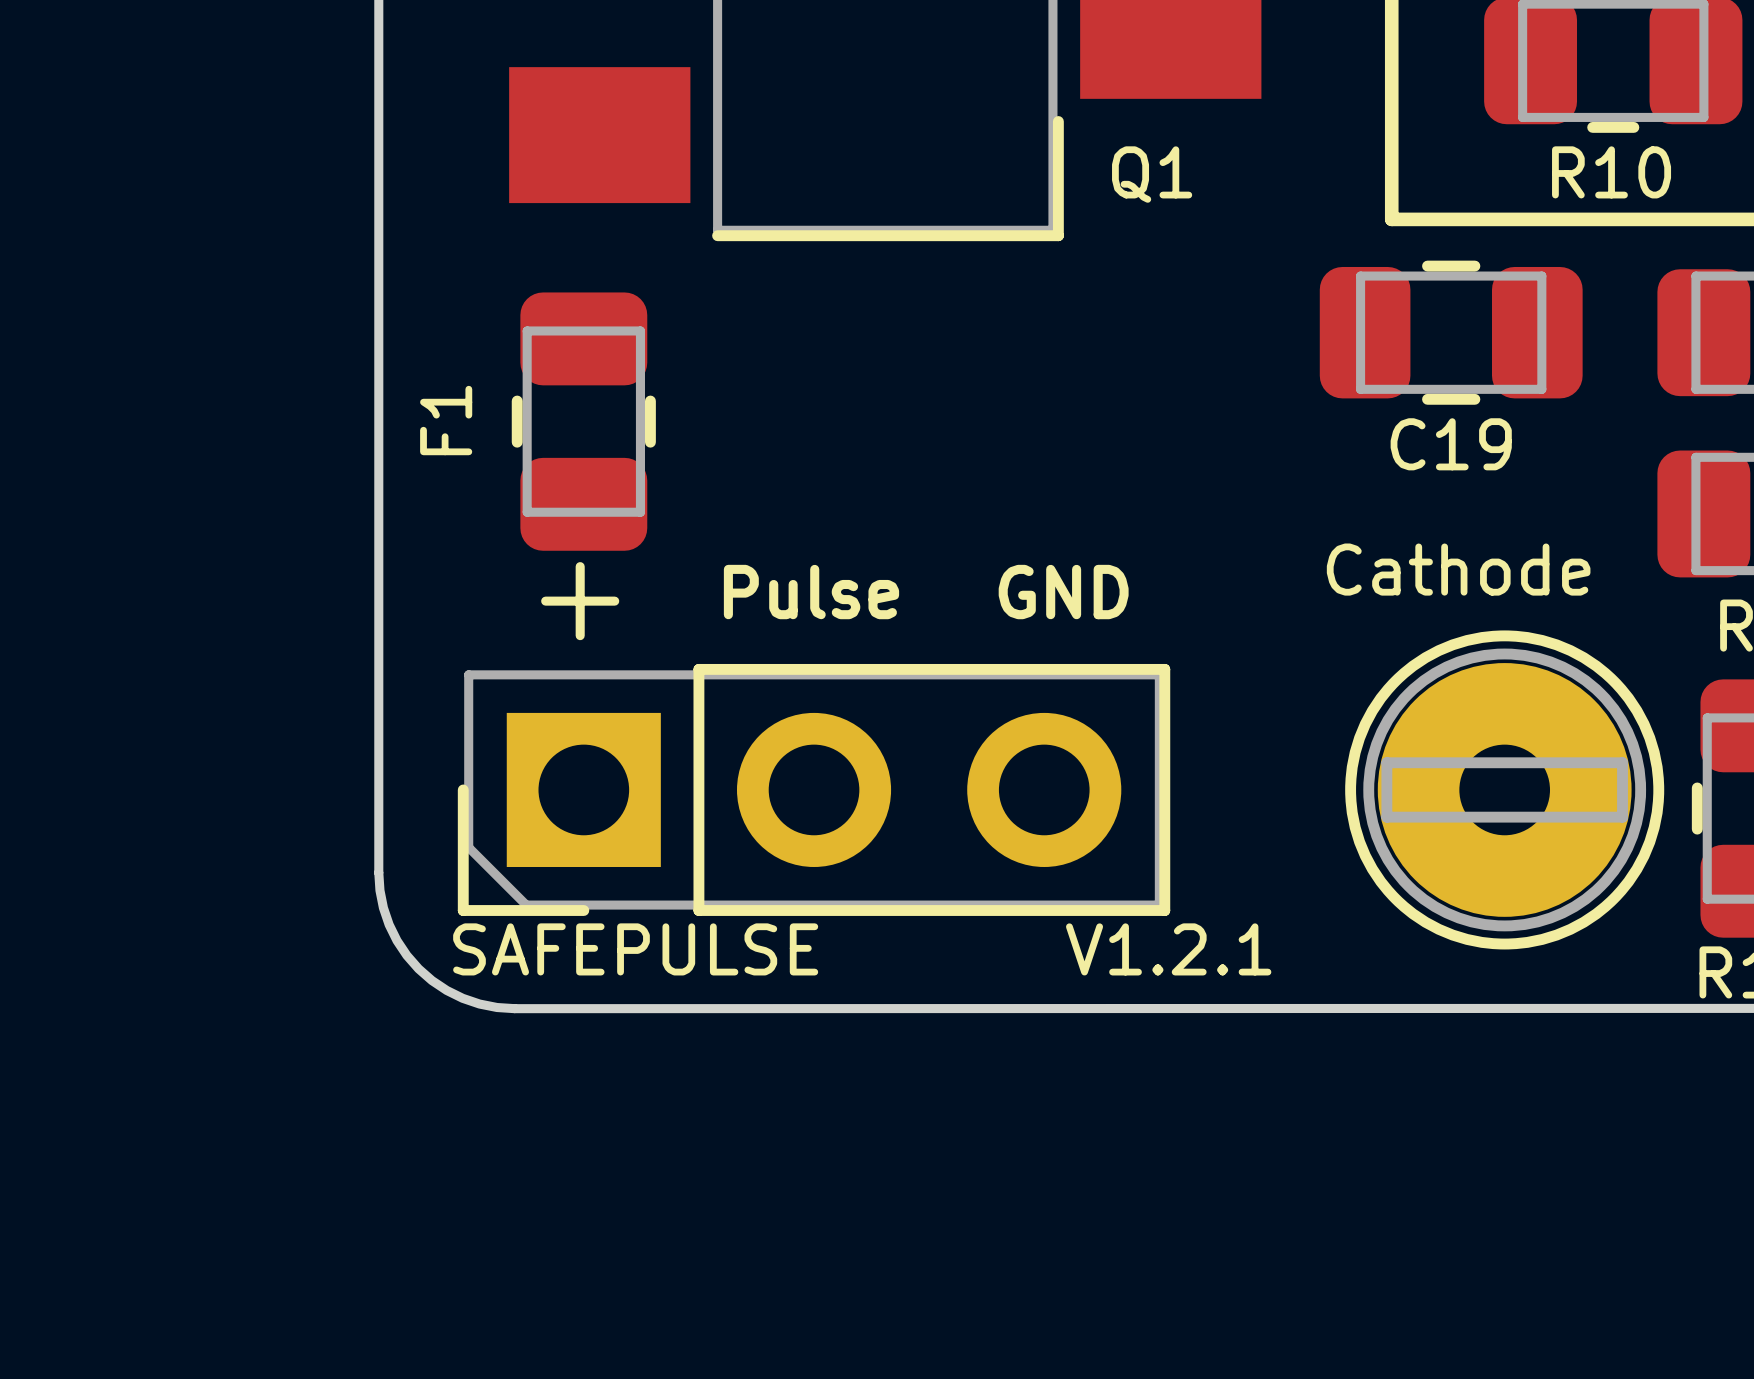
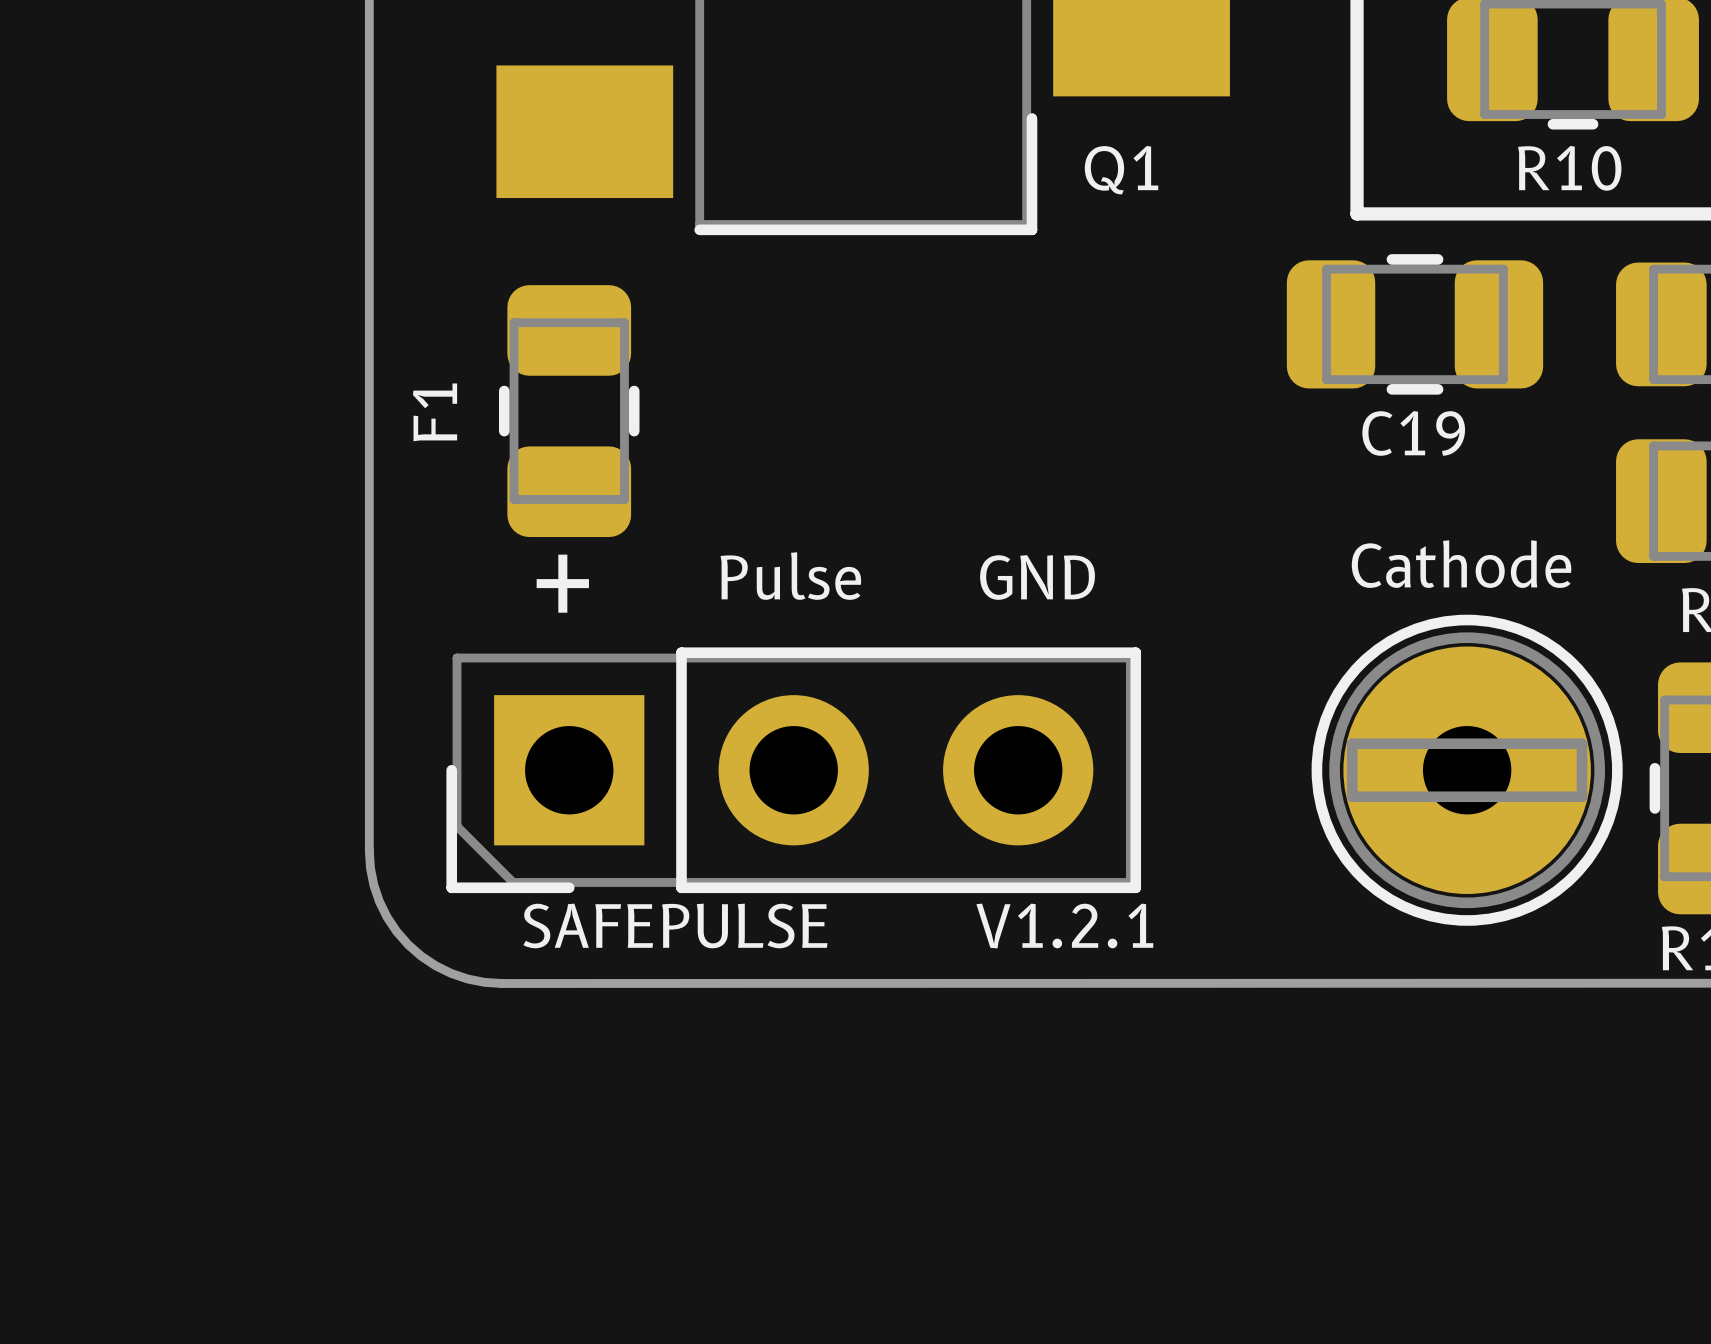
part value position: Cathode (1458, 569) -> Cathode (1461, 564)

